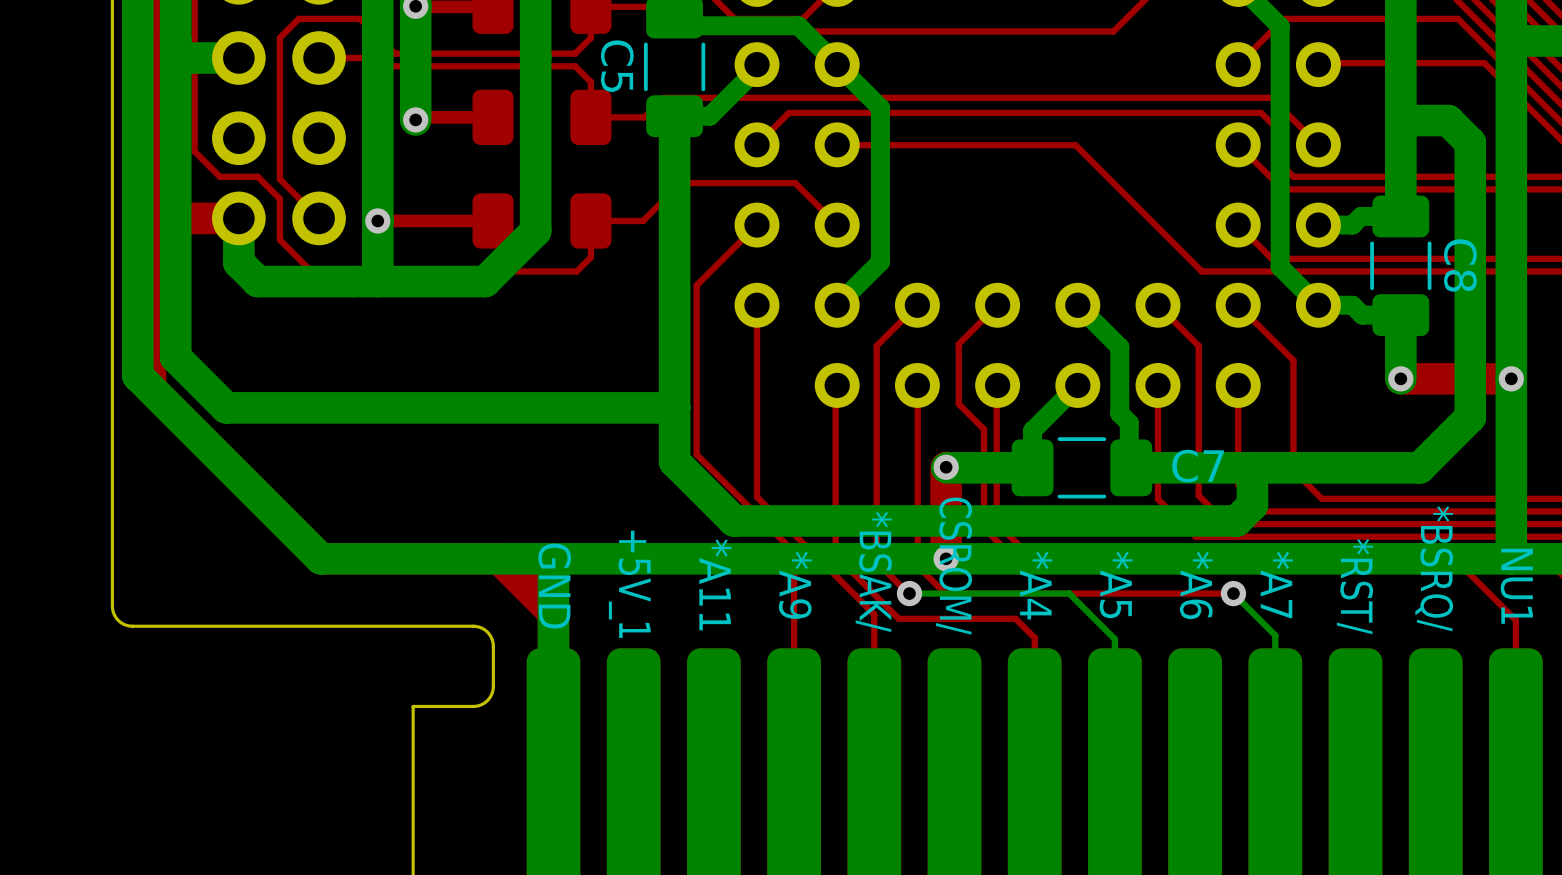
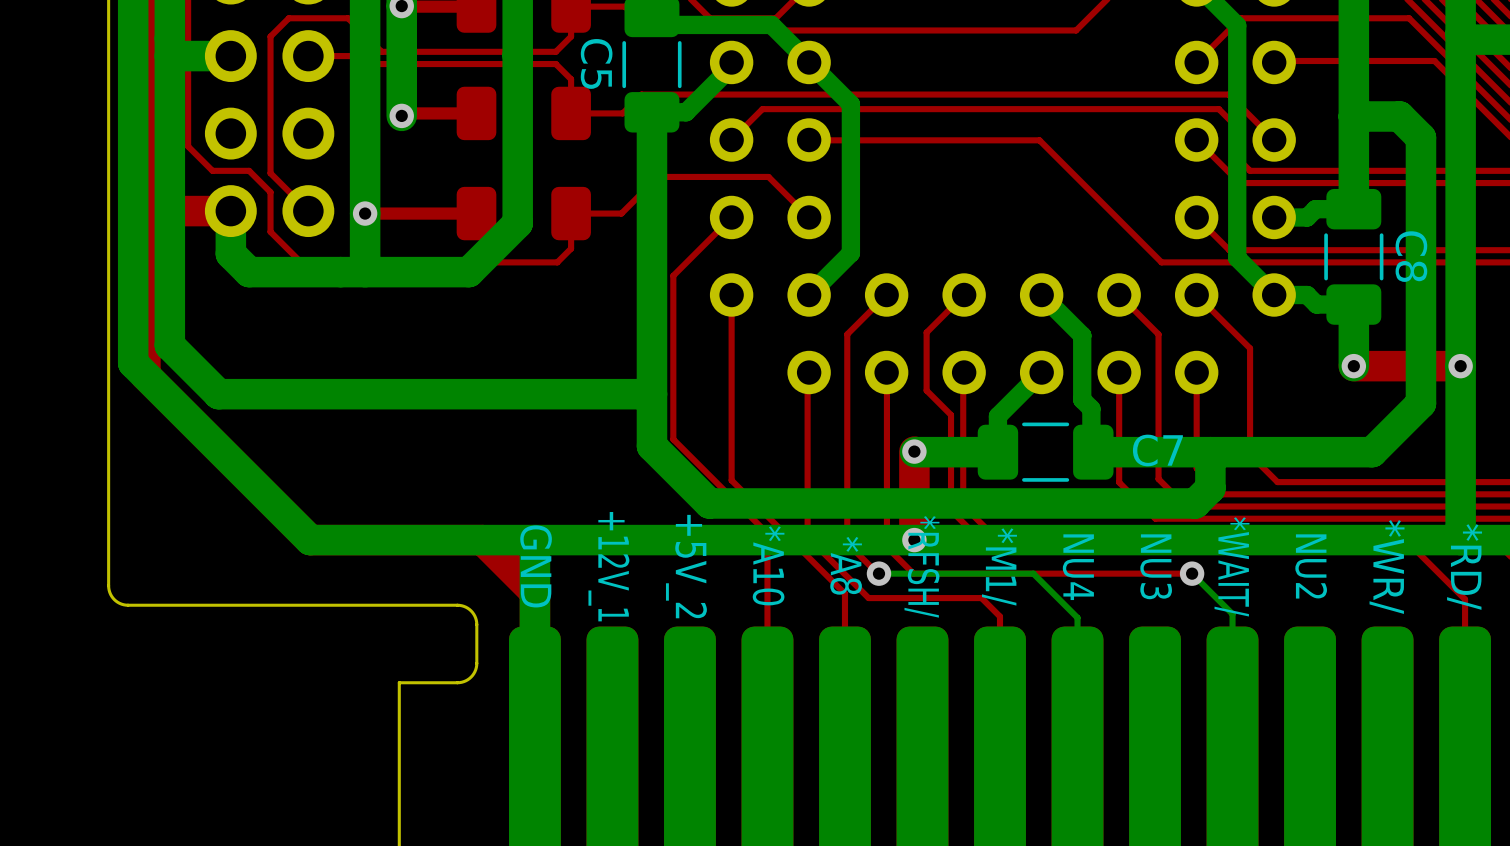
text: CSROM/ (953, 566) -> *RFSH/ (921, 566)
text: *BSRQ/ (1434, 568) -> *WR/ (1387, 567)
text: *BSAK/ (873, 571) -> *A8 (846, 565)
text: +5V_1 (629, 584) -> +12V_1 (608, 566)
text: *A11 (715, 584) -> +5V_2 (686, 566)
text: *A9 (795, 585) -> *A10 (768, 565)
text: *A4 (1036, 585) -> *M1/ (999, 566)
text: *A5 (1116, 585) -> NU4 (1078, 567)
text: *A6 (1196, 585) -> NU3 (1156, 566)
text: *A7 (1276, 585) -> *WAIT/ (1232, 566)
text: *RST/ (1354, 586) -> NU2 (1311, 566)
text: NU1 (1516, 586) -> *RD/ (1464, 567)

